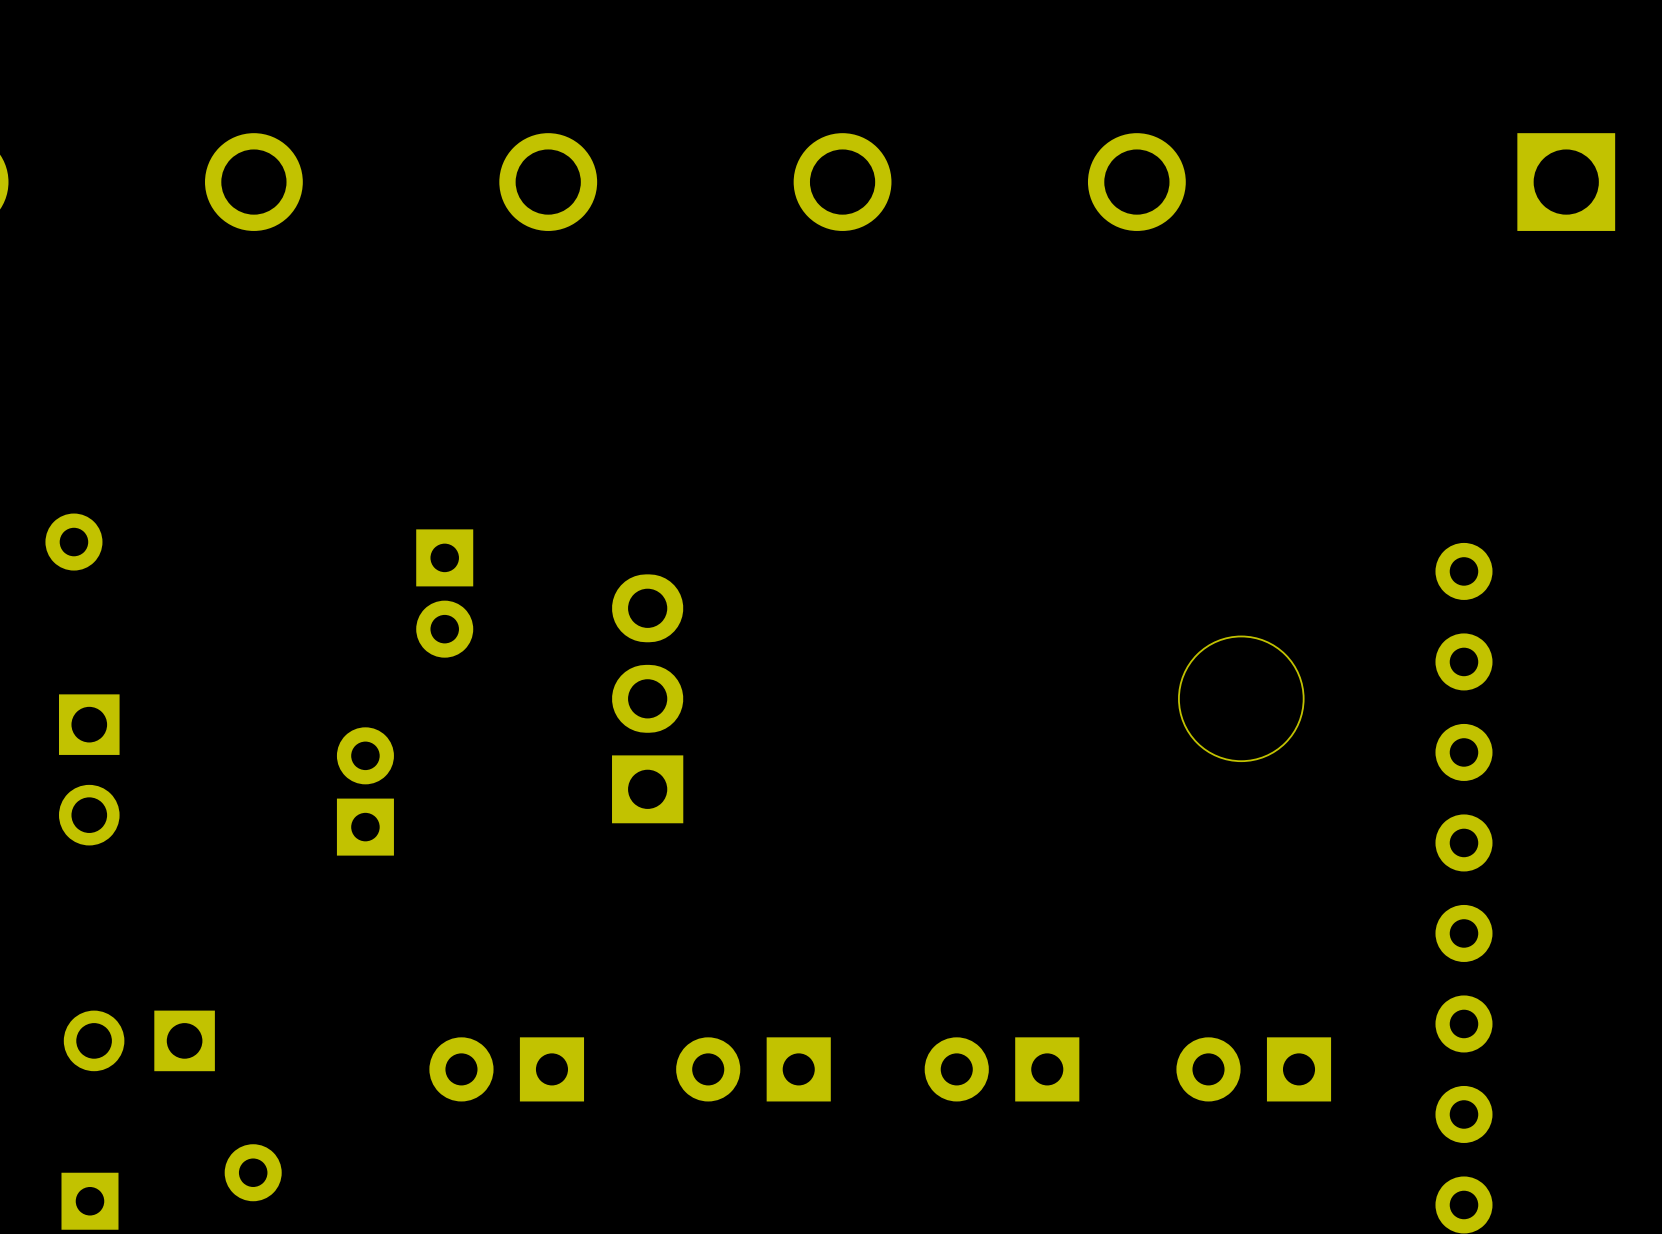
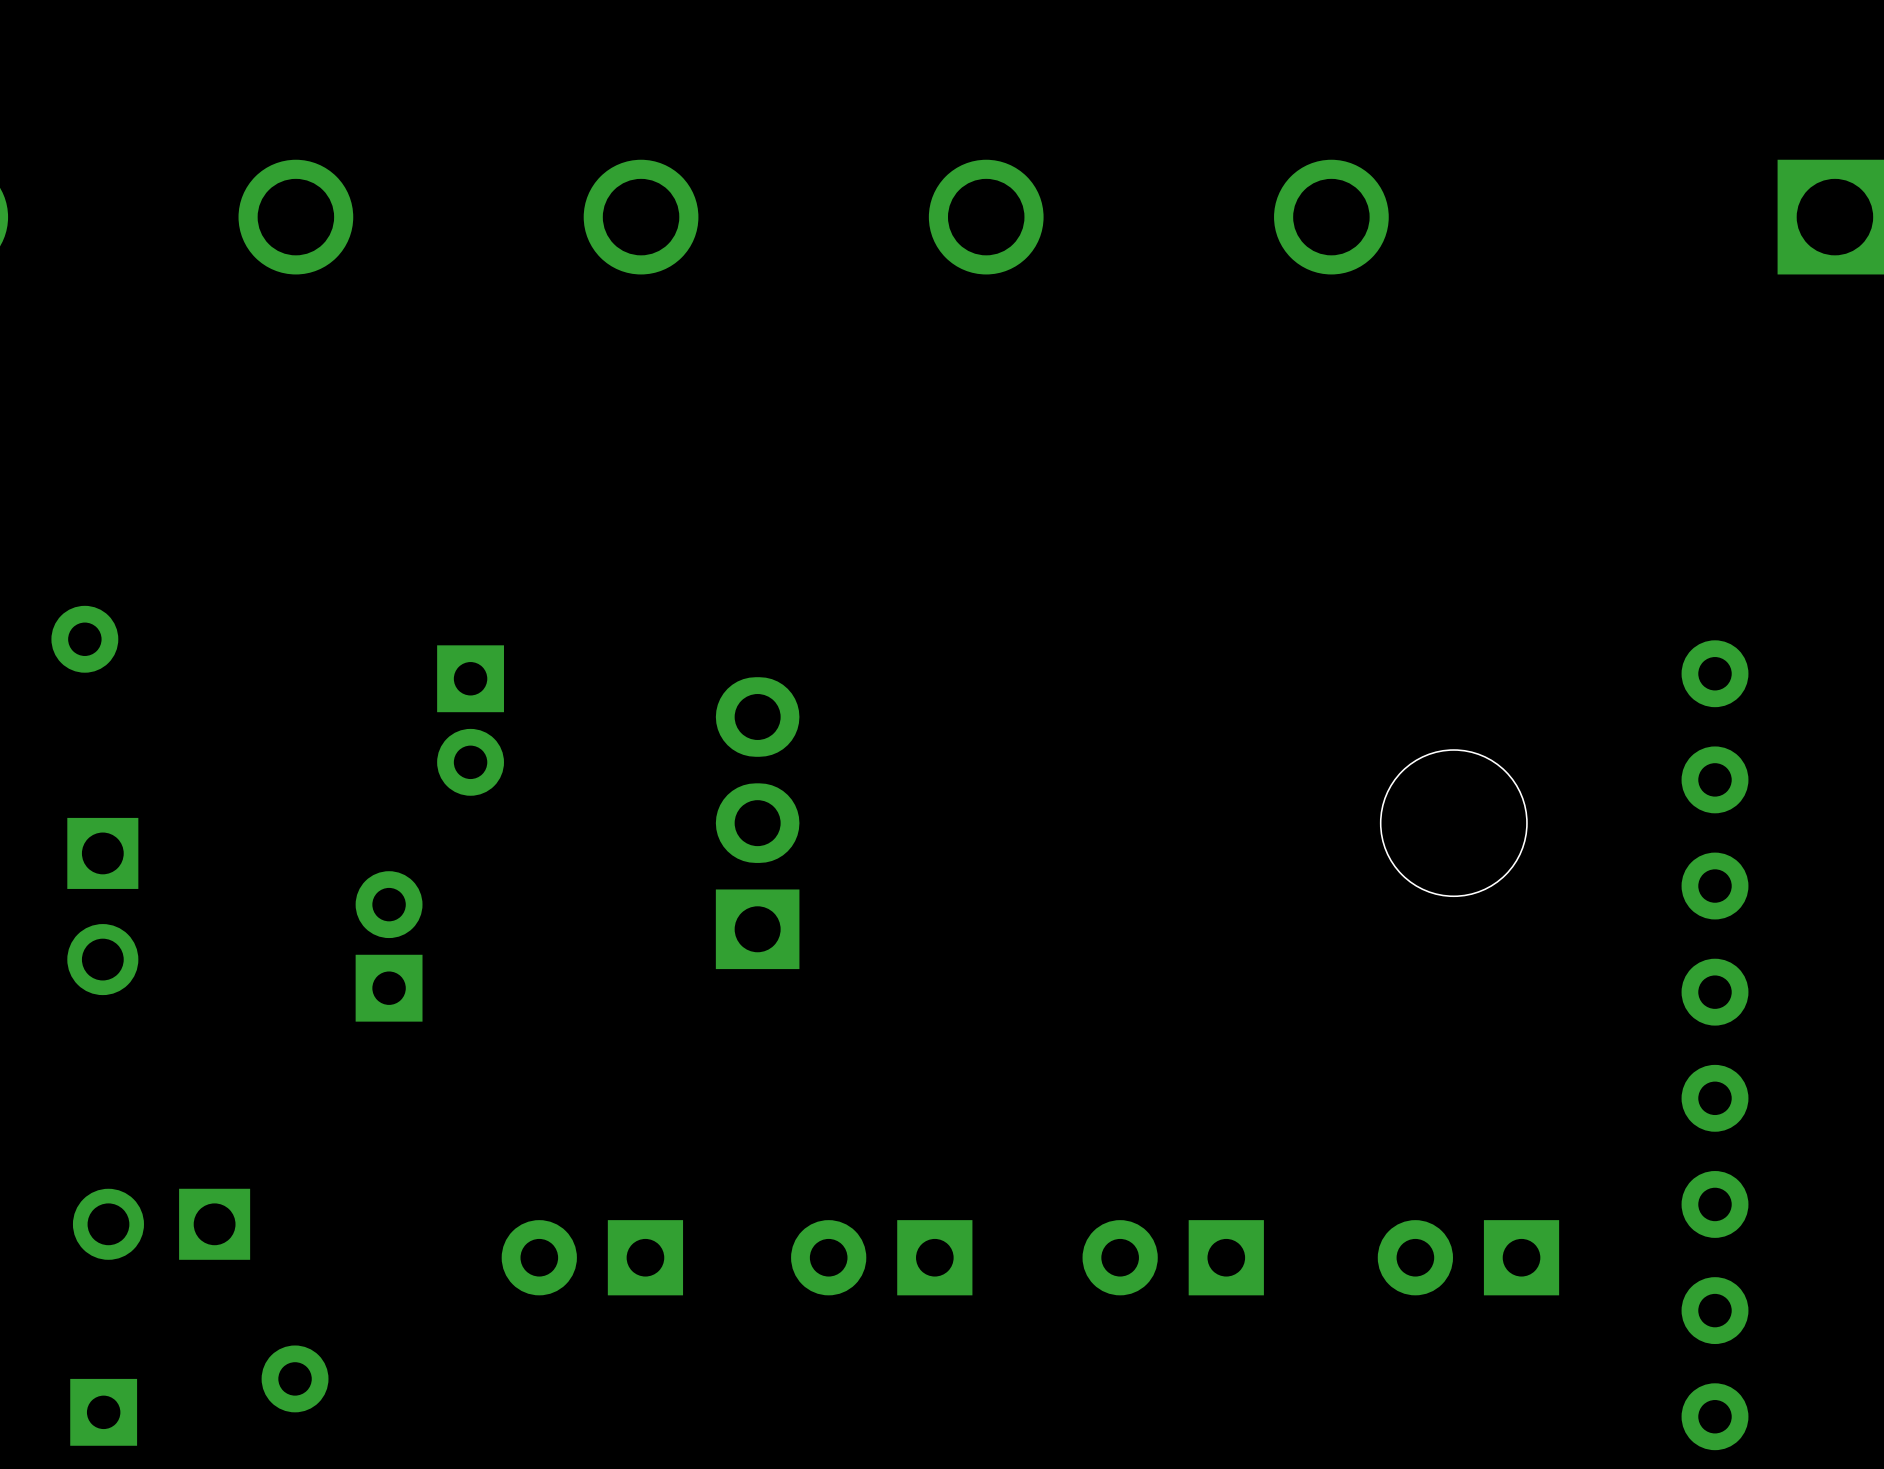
part position: (444, 593) -> (470, 720)
part position: (365, 791) -> (389, 946)

